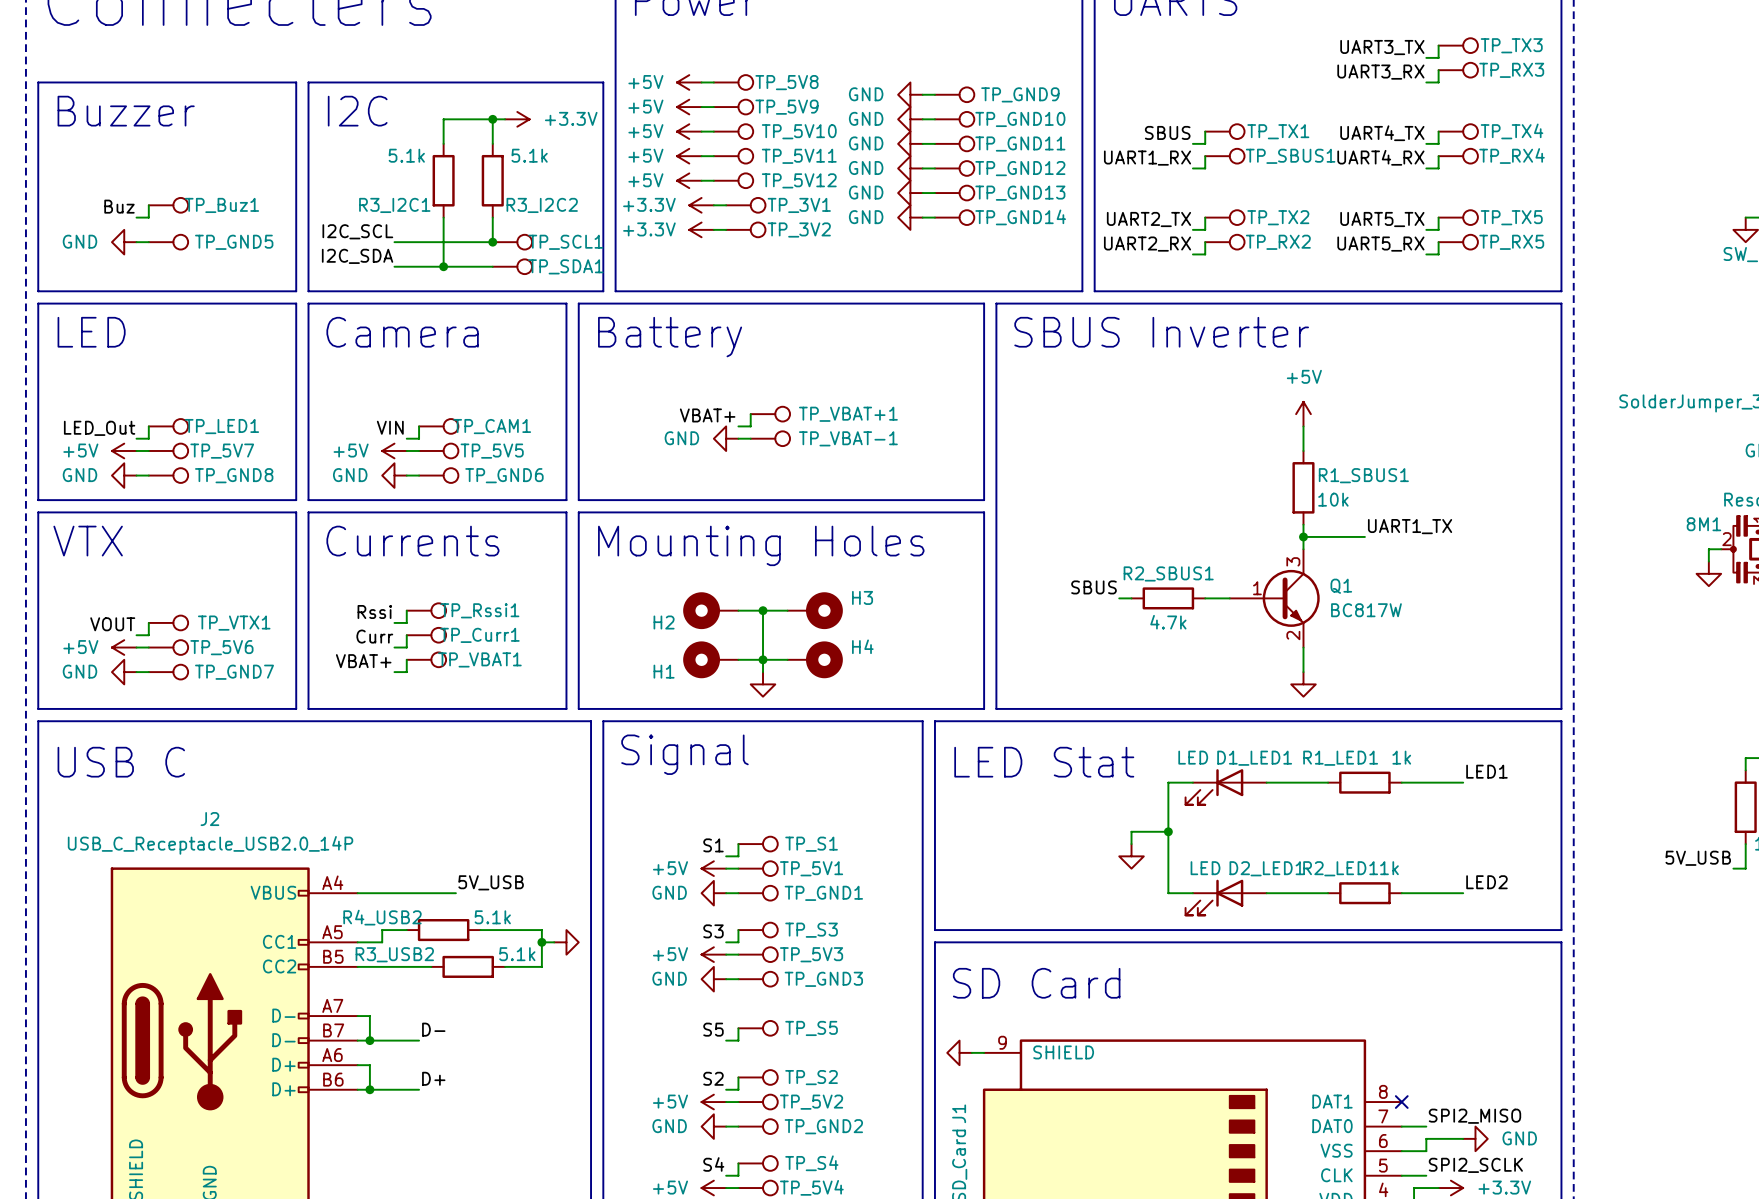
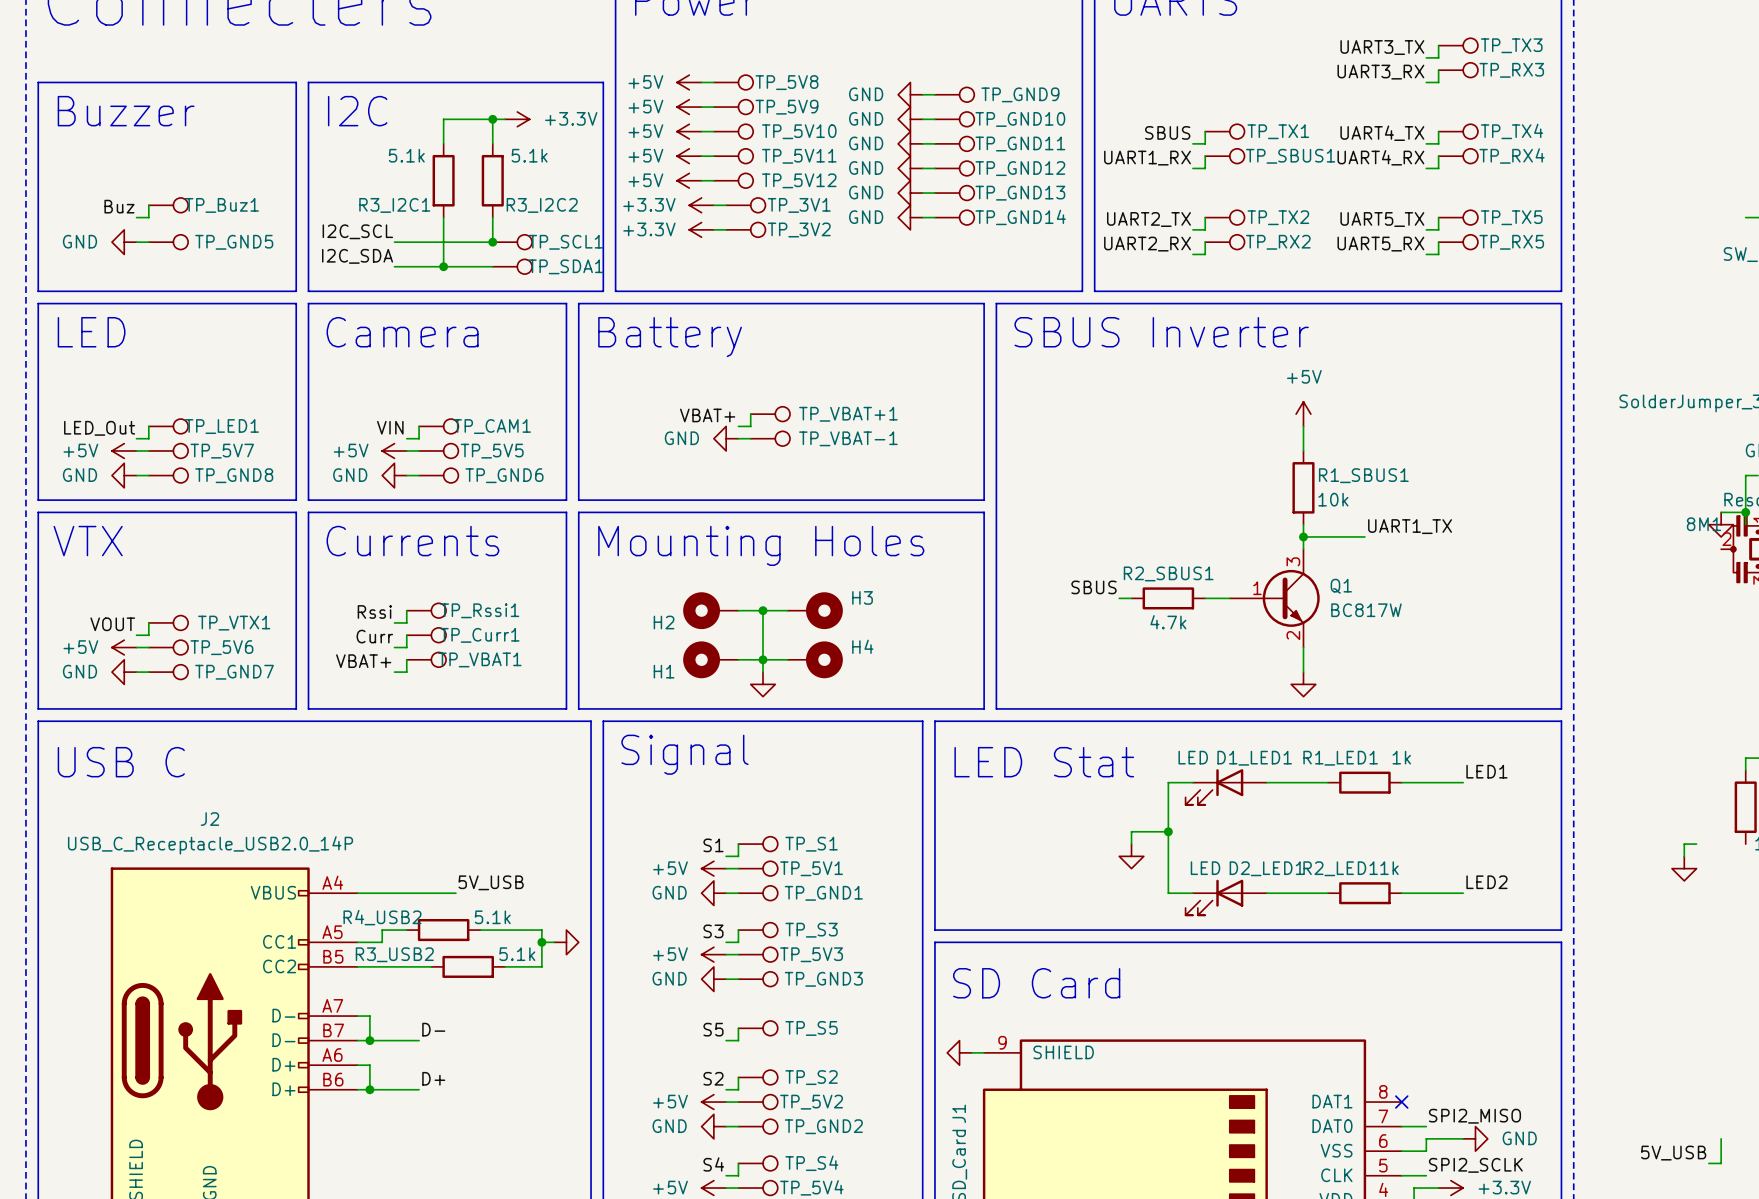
power symbol: (1745, 229) -> none
wire: none -> (1757, 475) (1745, 475) (1745, 524)
wire: none -> (1721, 512) (1745, 512)
junction: none -> (1745, 512)
wire: (1721, 549) (1708, 549) (1708, 561) -> none
power symbol position: (1708, 573) -> (1721, 524)
wire: none -> (1696, 844) (1684, 844) (1684, 856)
wire: (1745, 844) (1745, 868) (1733, 868) -> none
label: 5V_USB (1698, 858) -> none
power symbol: none -> (1684, 868)
wire: none -> (1721, 1138) (1721, 1163) (1708, 1163)
label: none -> 5V_USB (1673, 1153)

